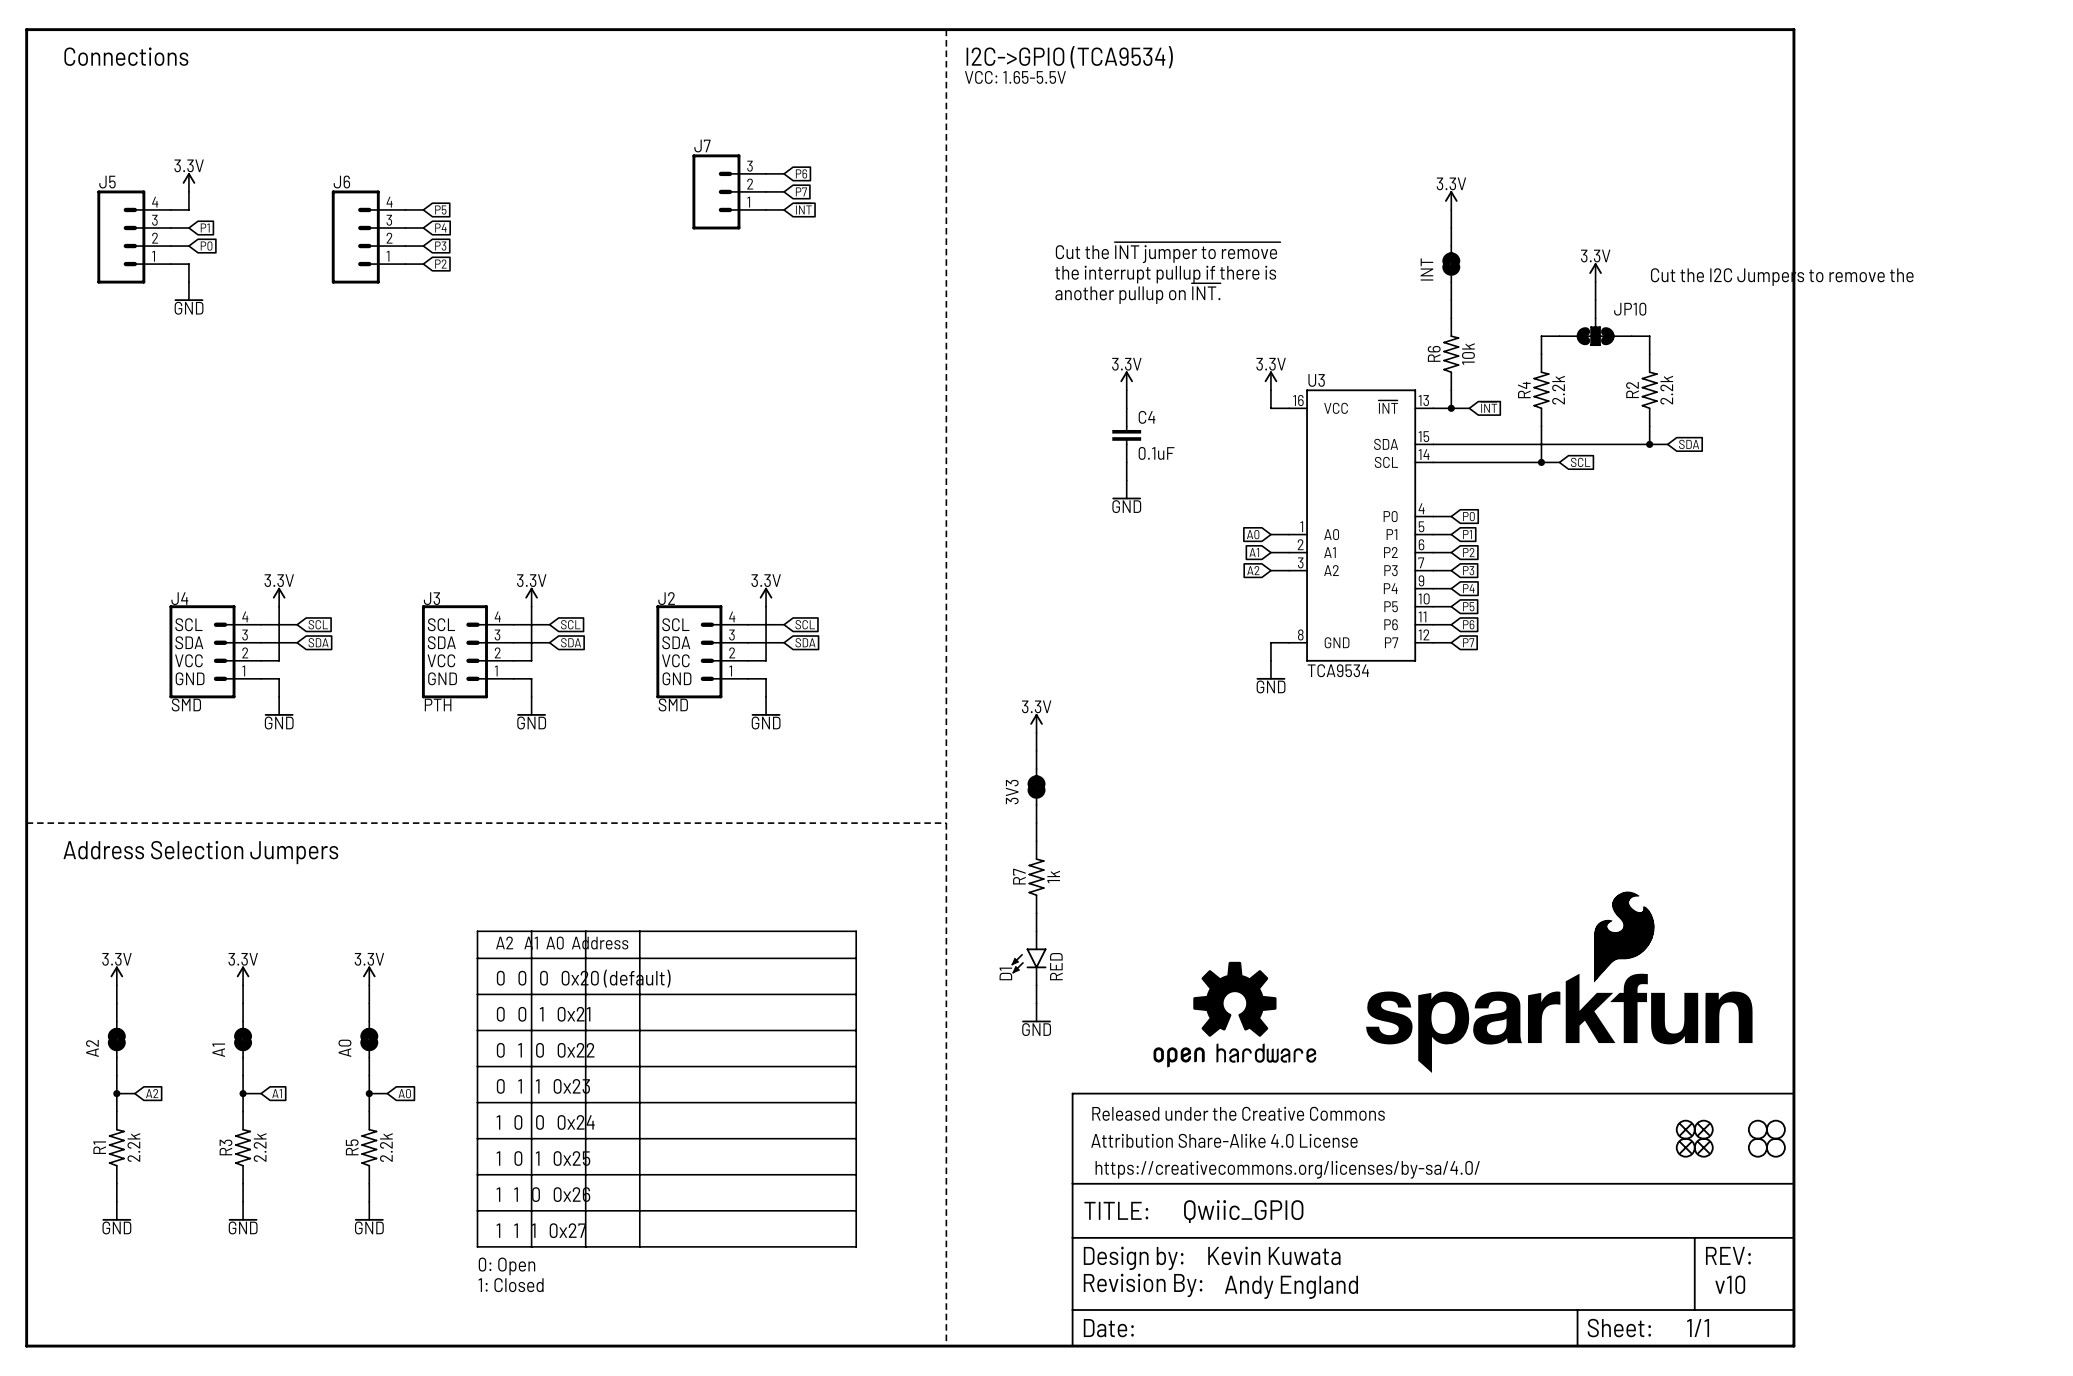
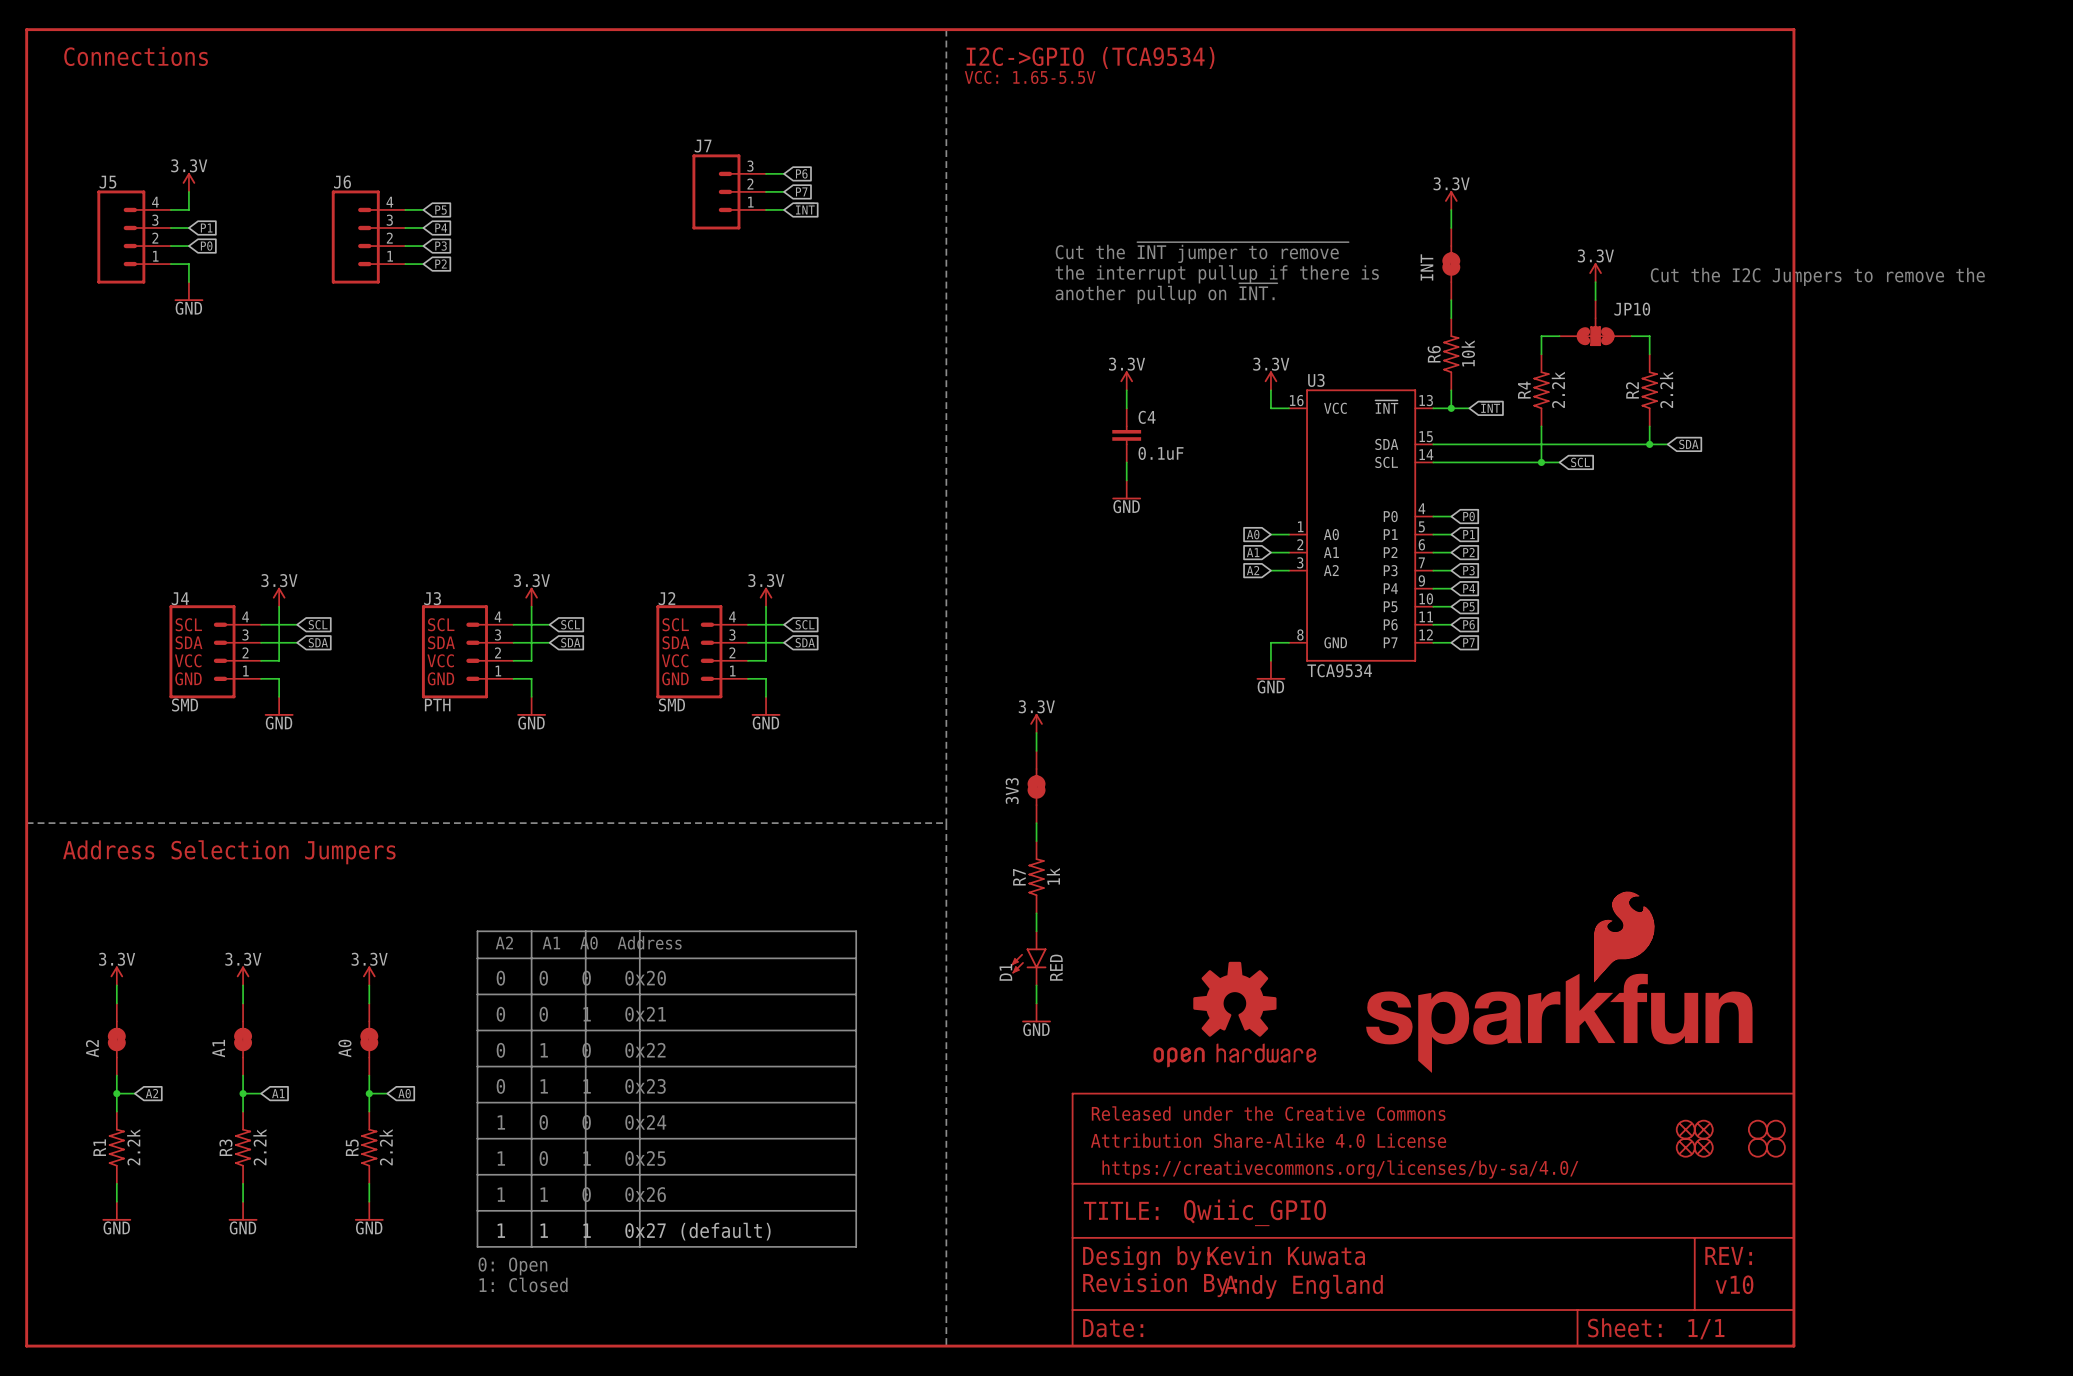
text: 0 0 0 0x20 (default) (583, 978) -> 0 0 0 0x20 (581, 978)
text: 1 1 1 0x27 (541, 1230) -> 1 1 1 0x27 (default) (634, 1231)

